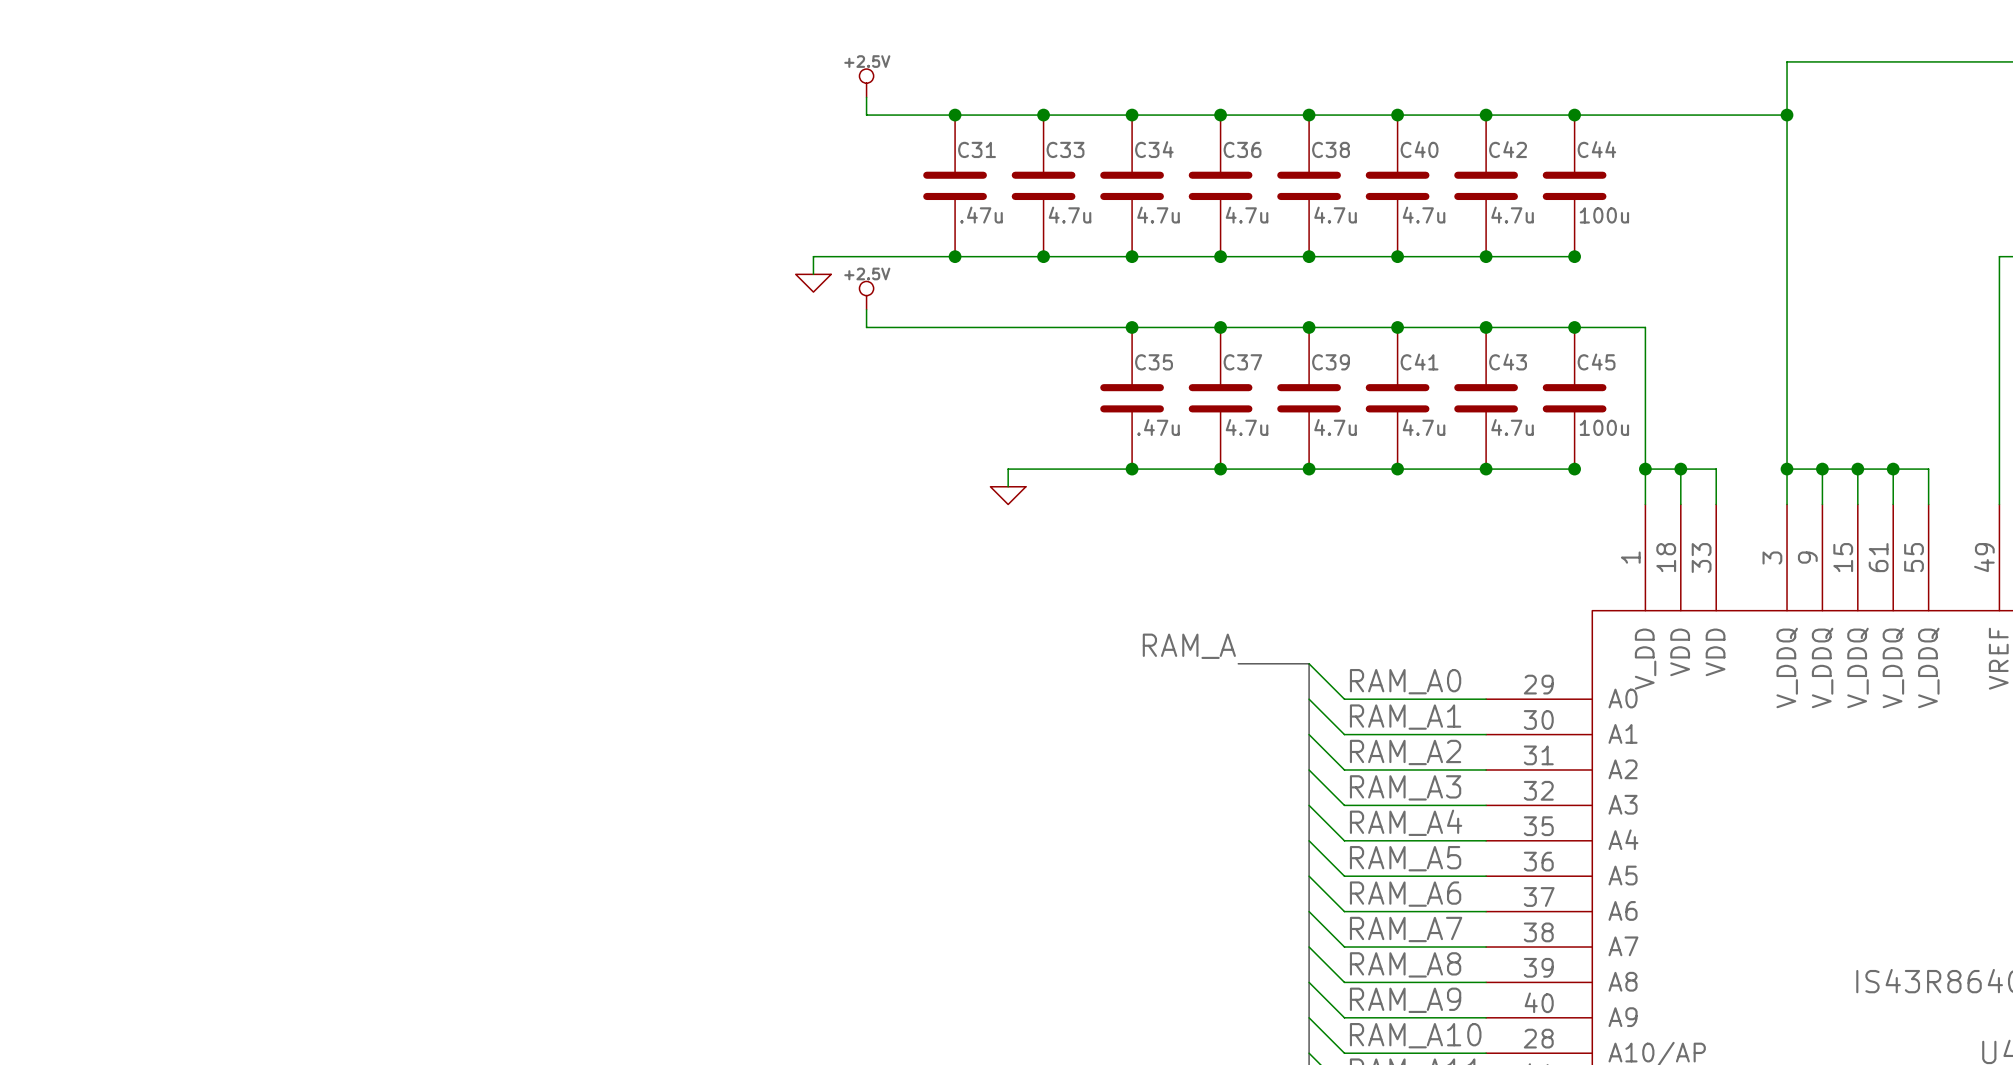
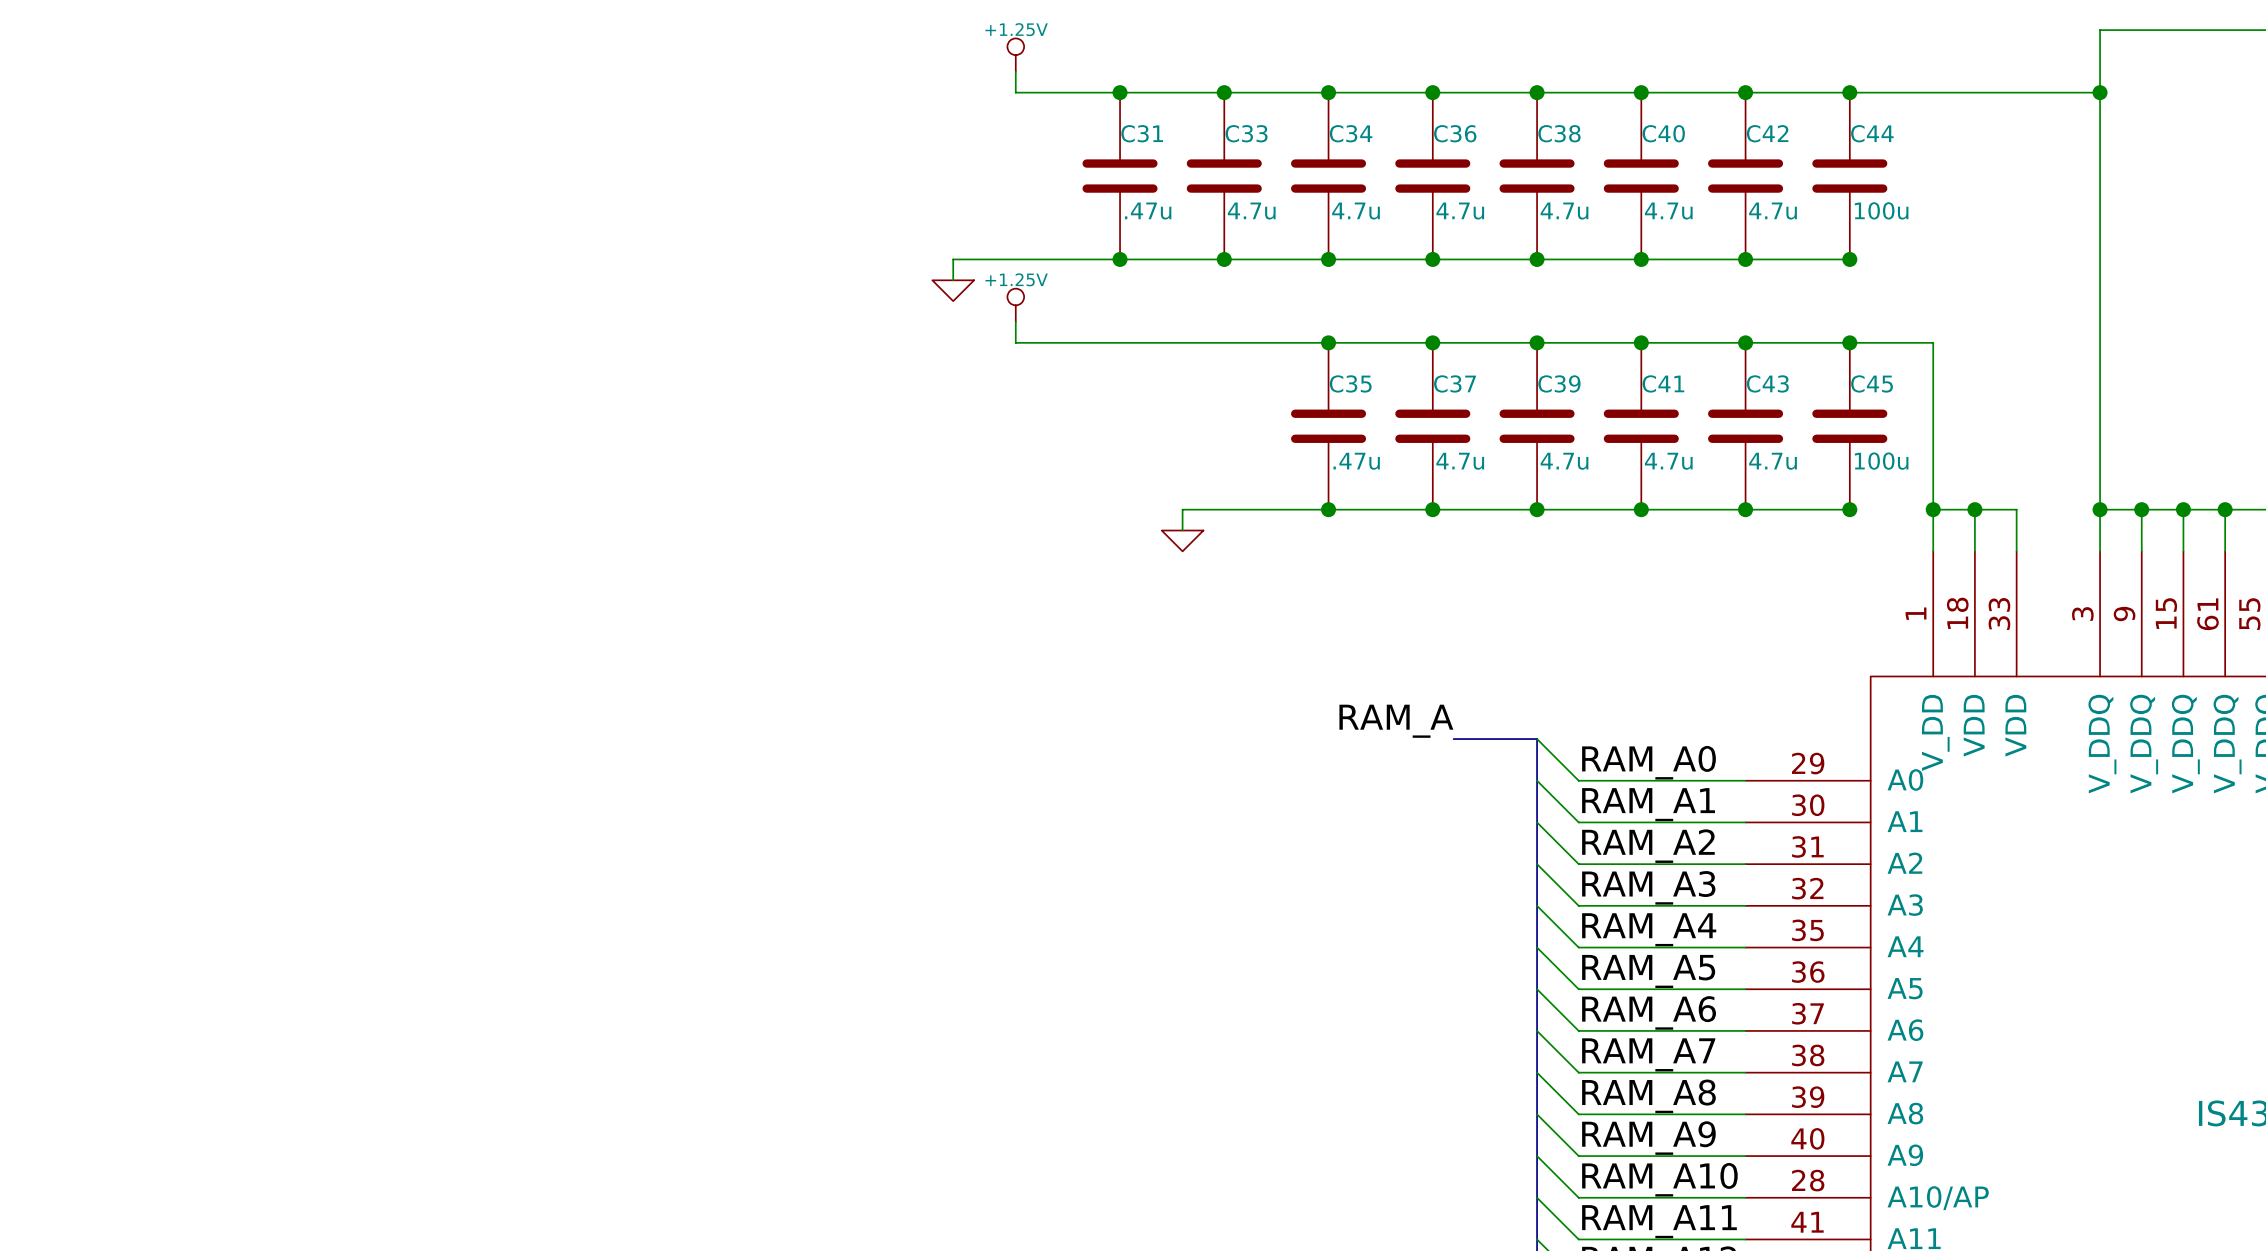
power symbol: +2.5V (866, 83) -> +1.25V (1015, 55)
power symbol: +2.5V (866, 295) -> +1.25V (1015, 305)

